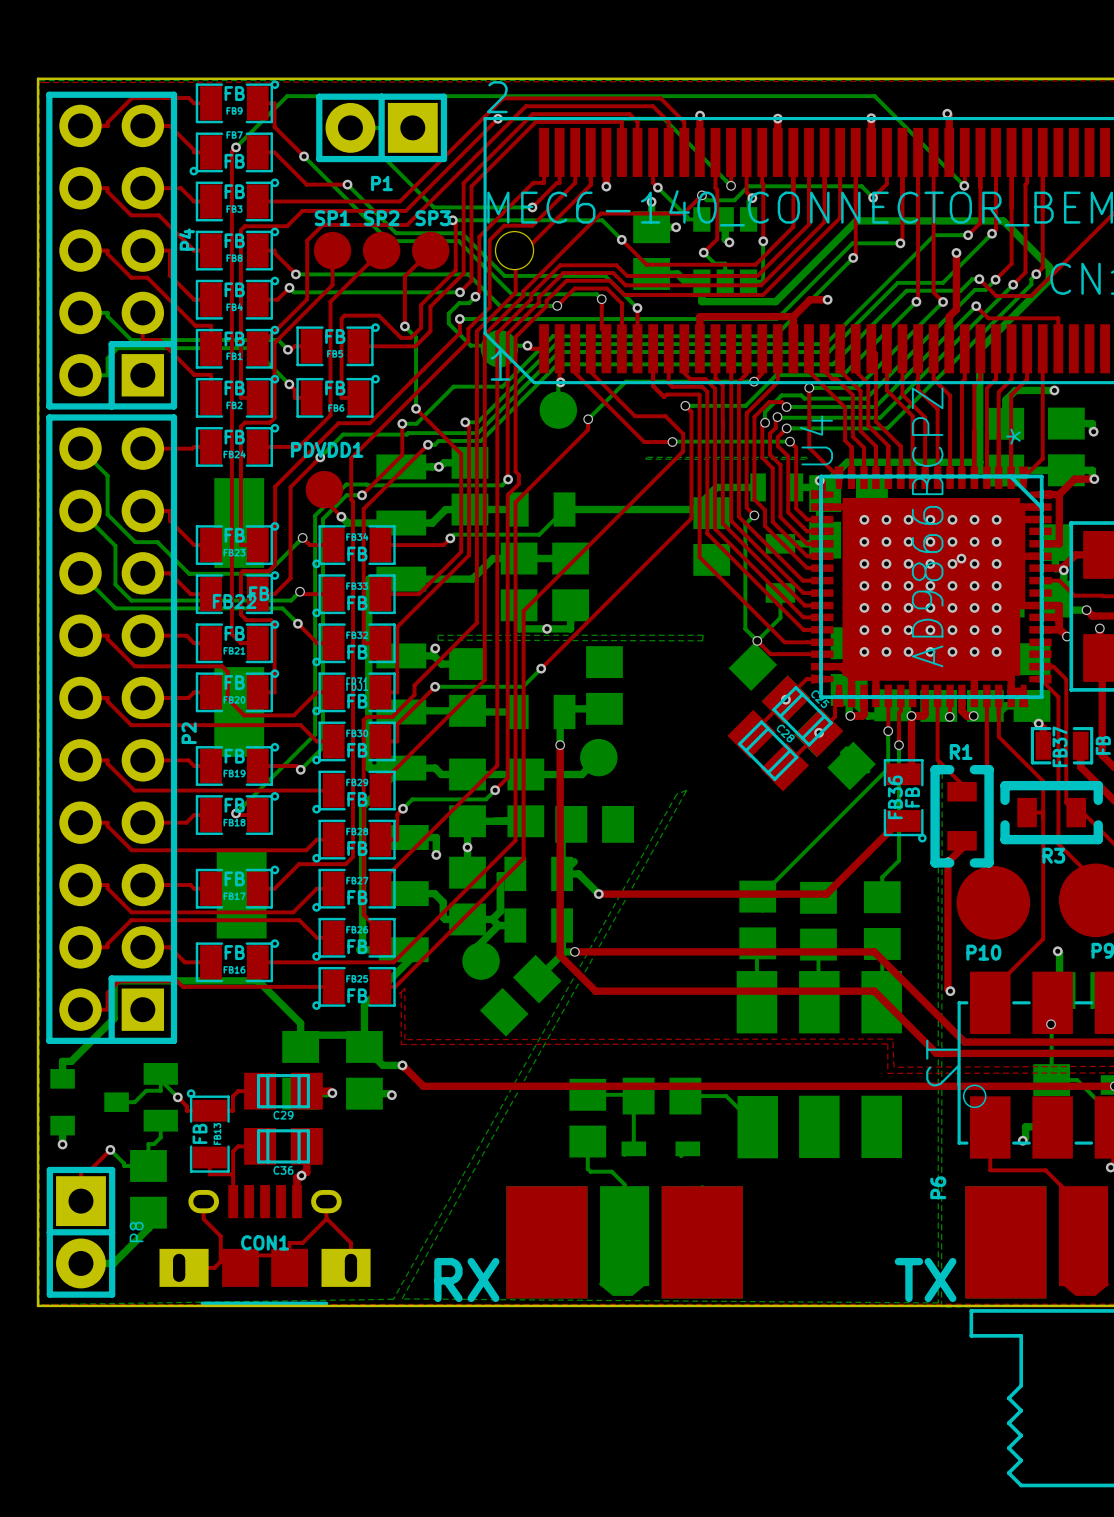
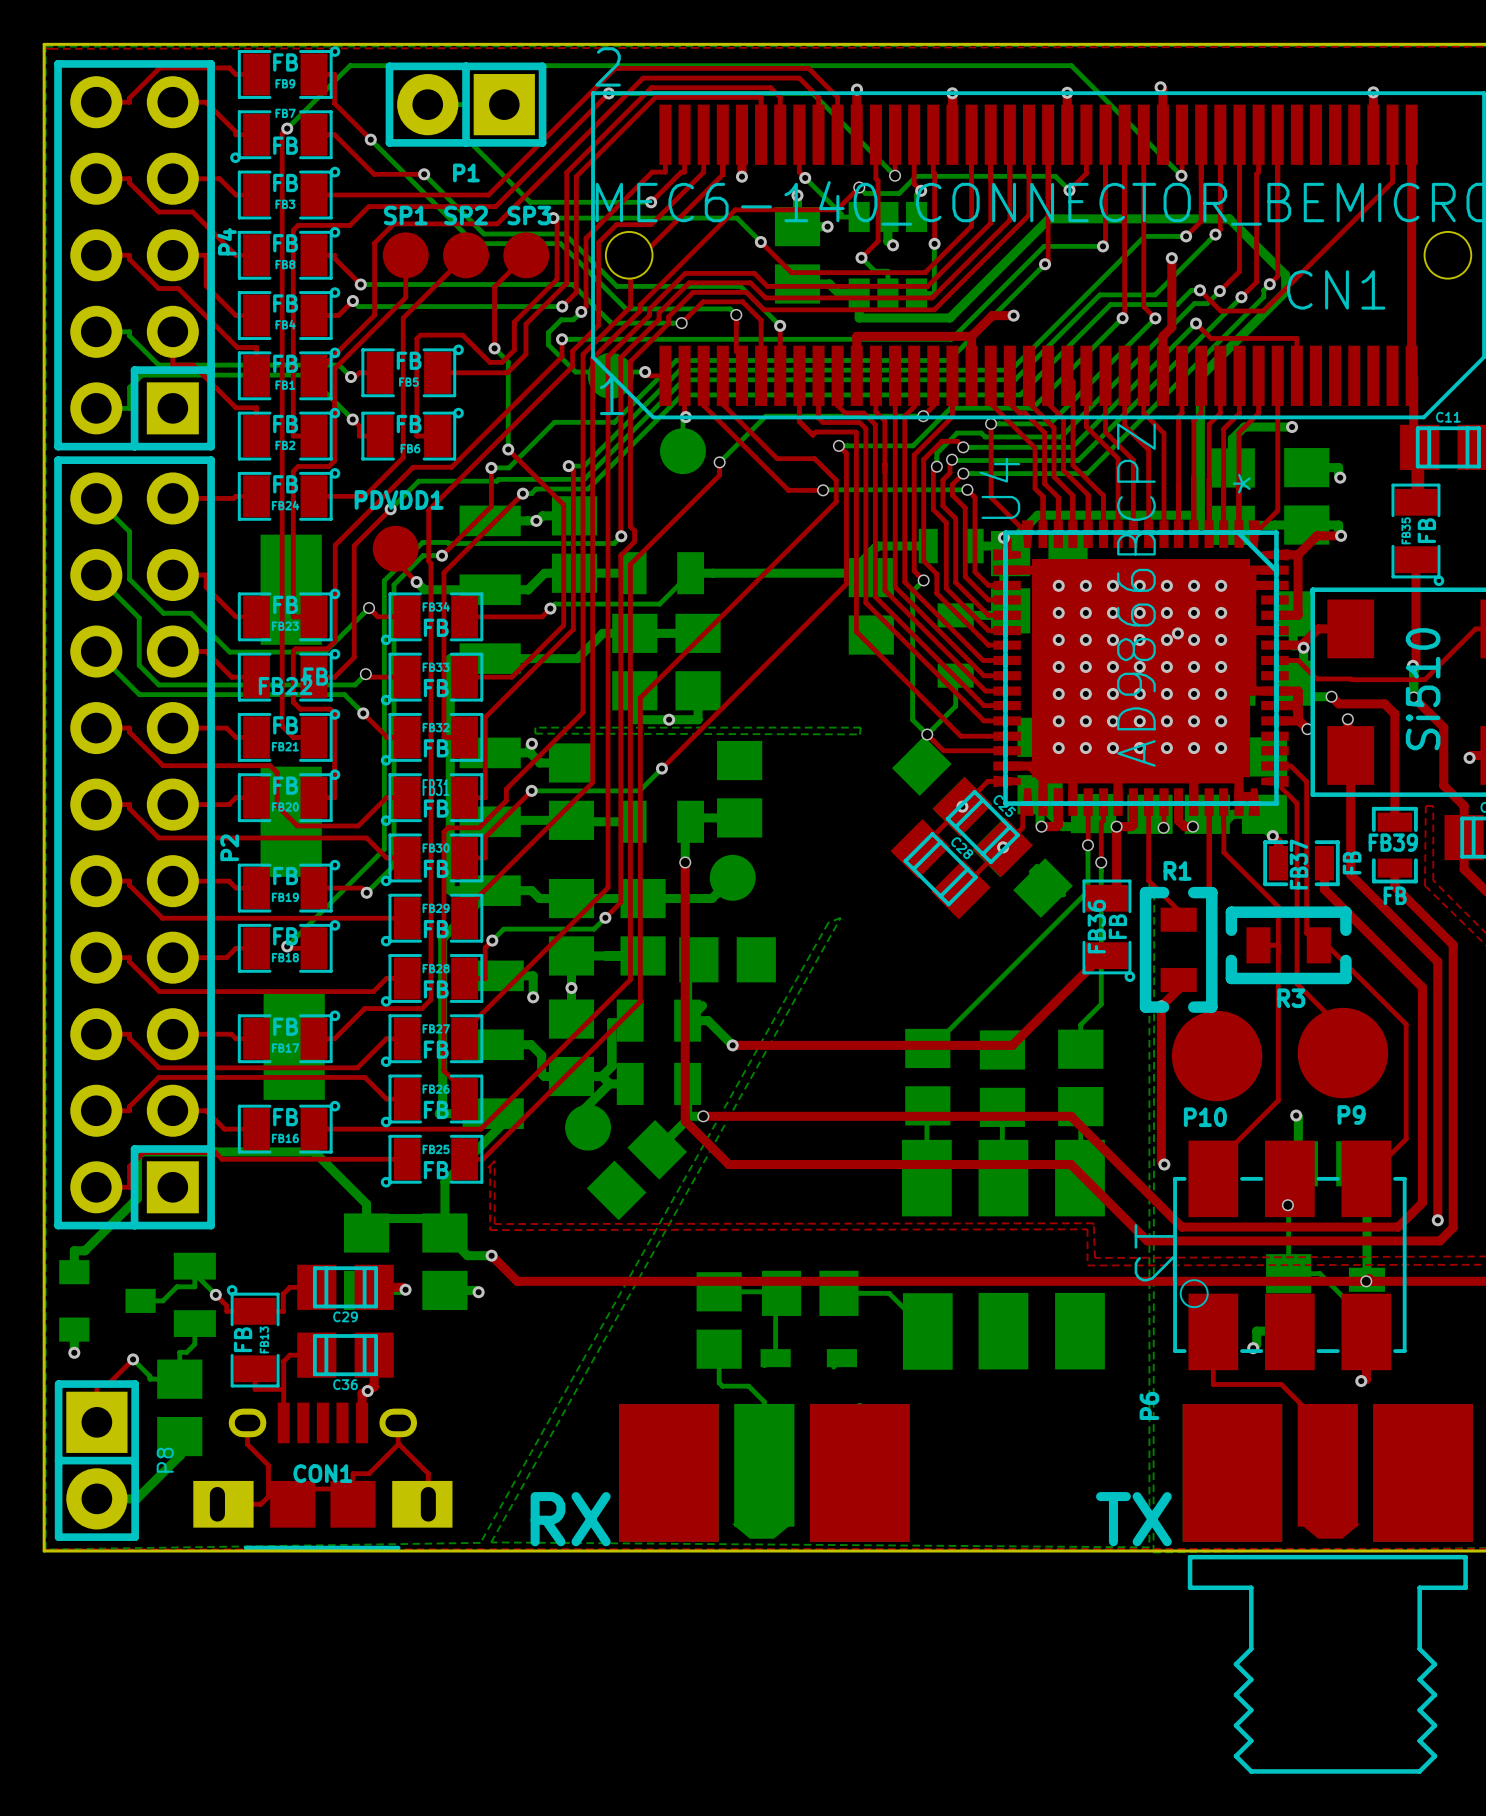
bottom zone outline: (646, 457) (806, 457) (806, 459) (646, 459) (646, 457) -> none

